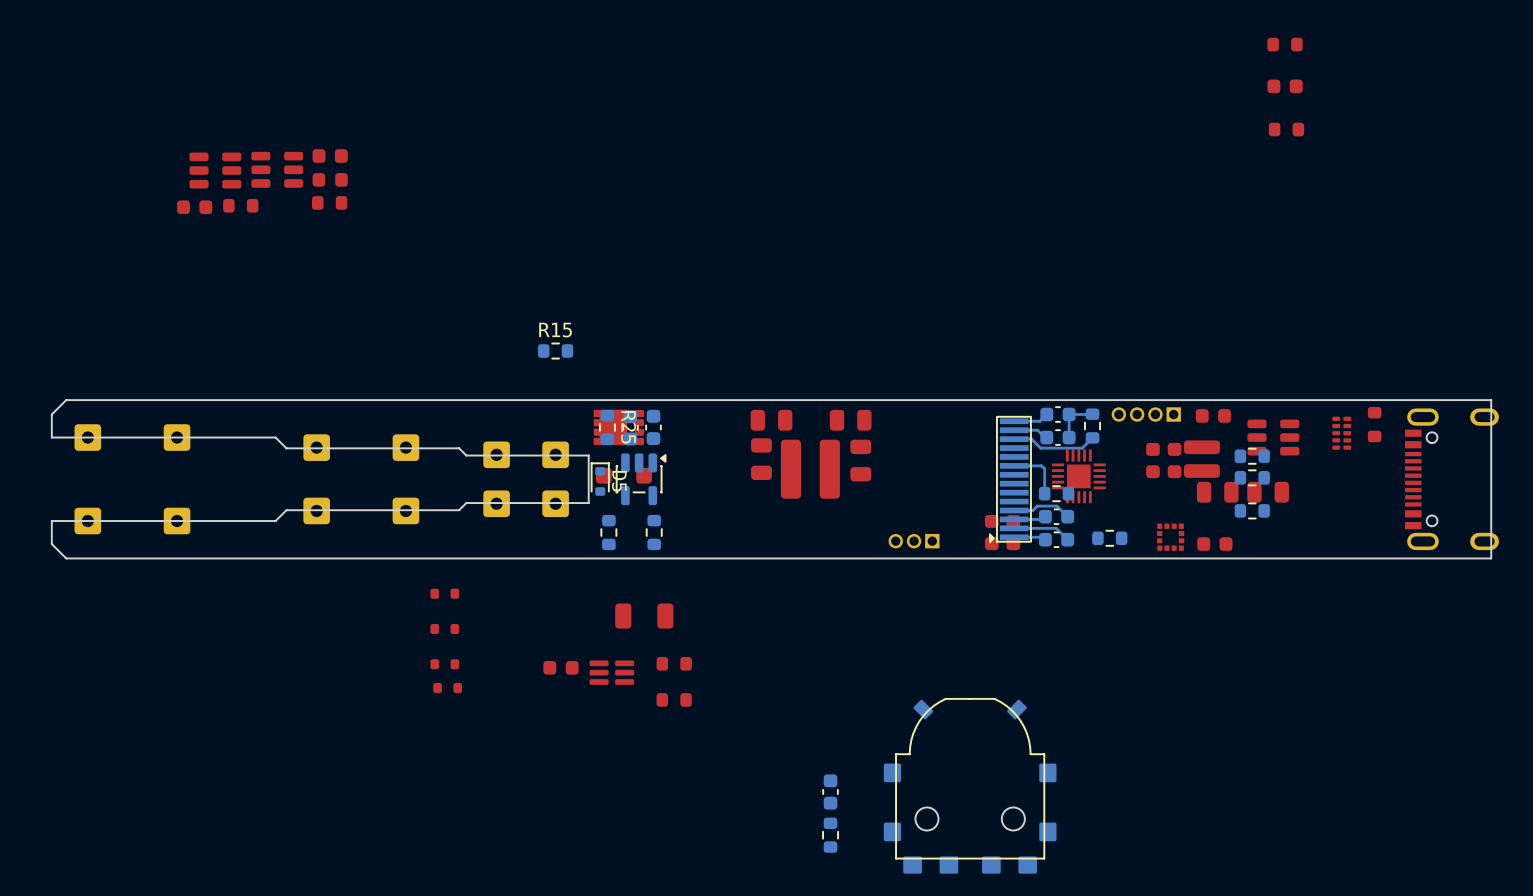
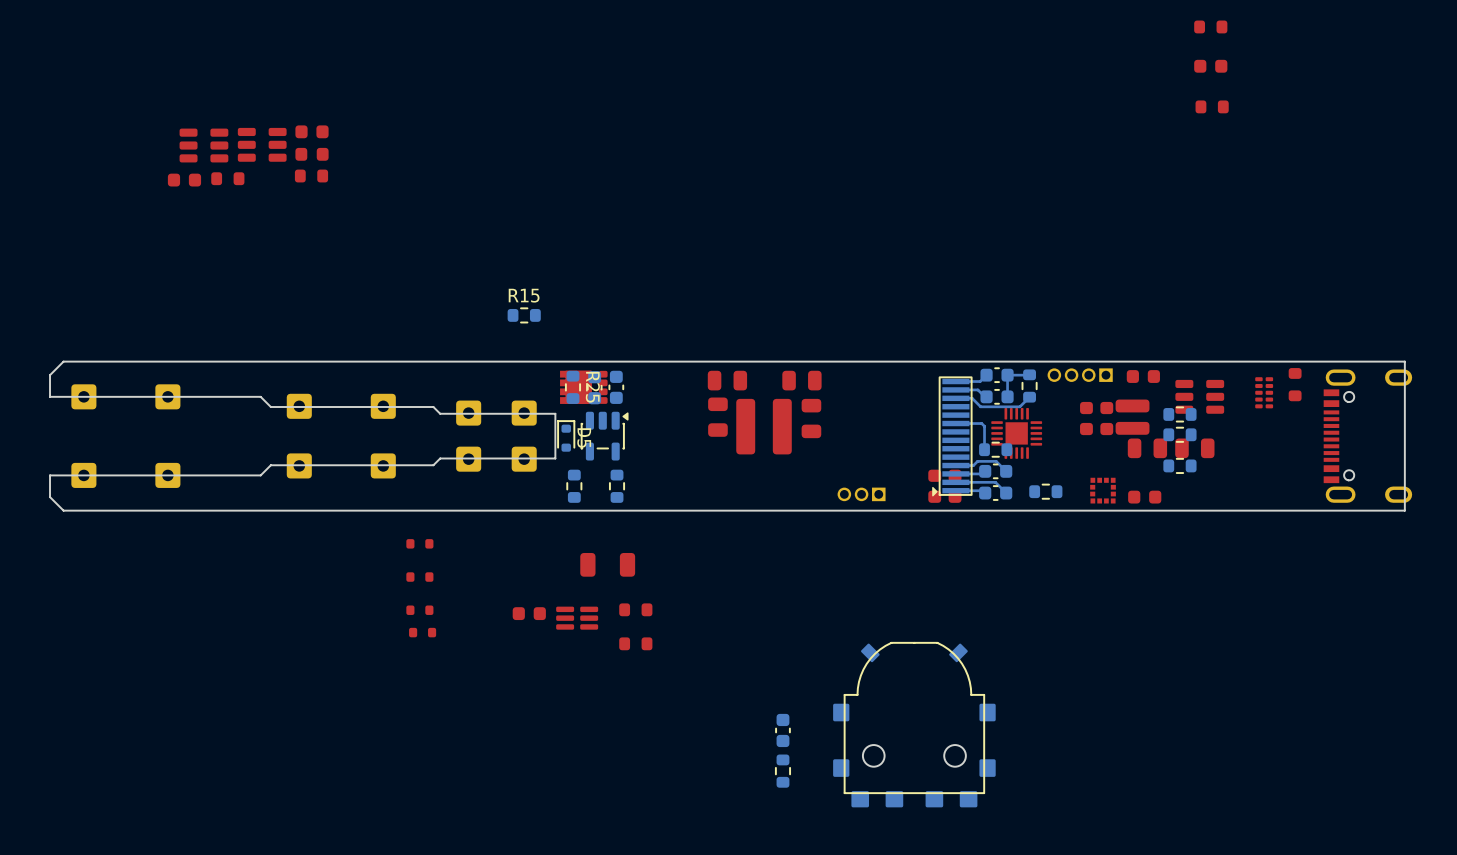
part: (623, 475) -> none

